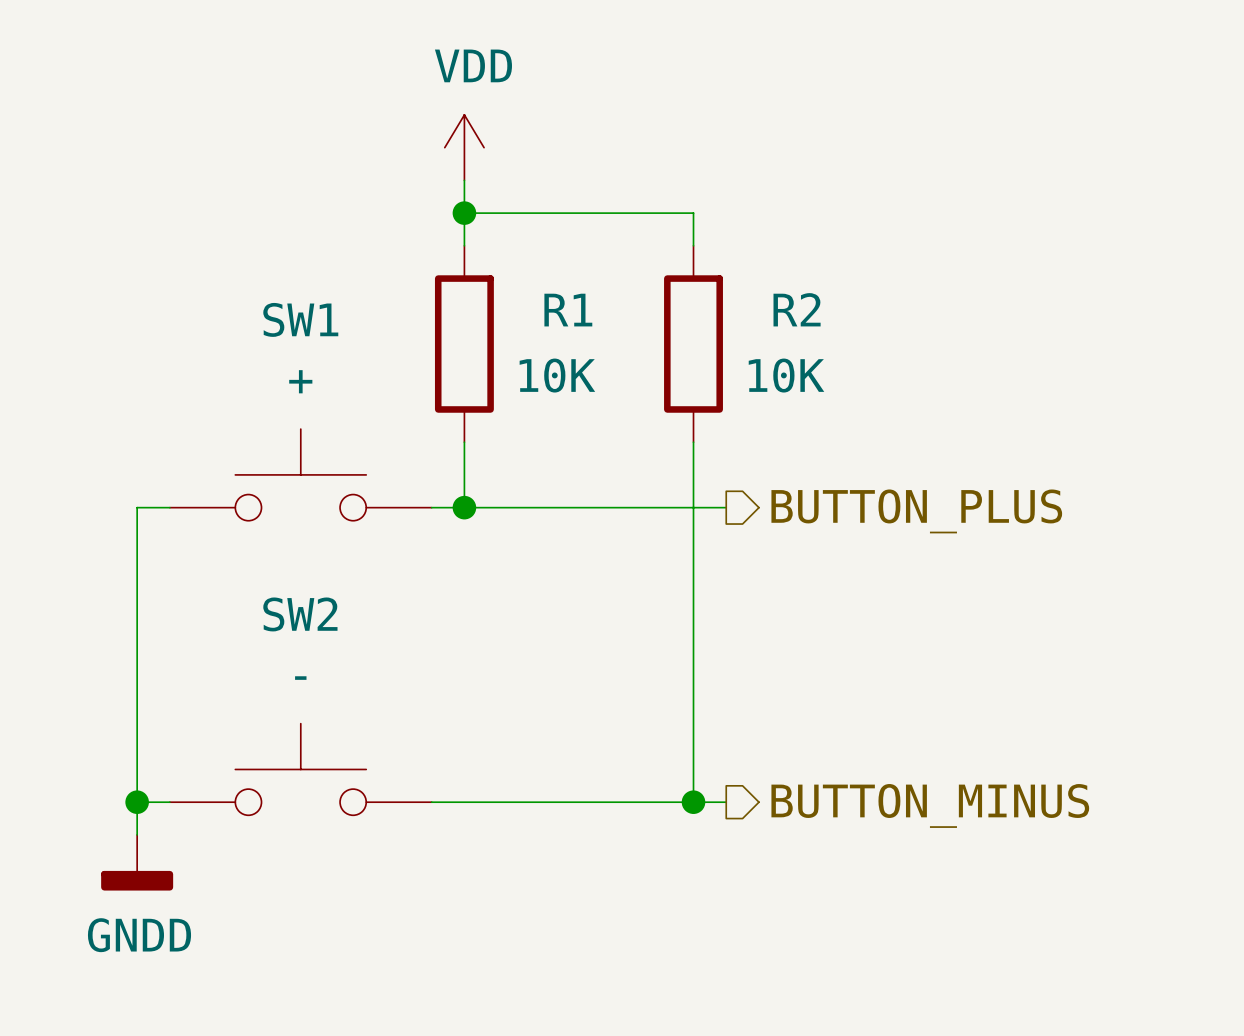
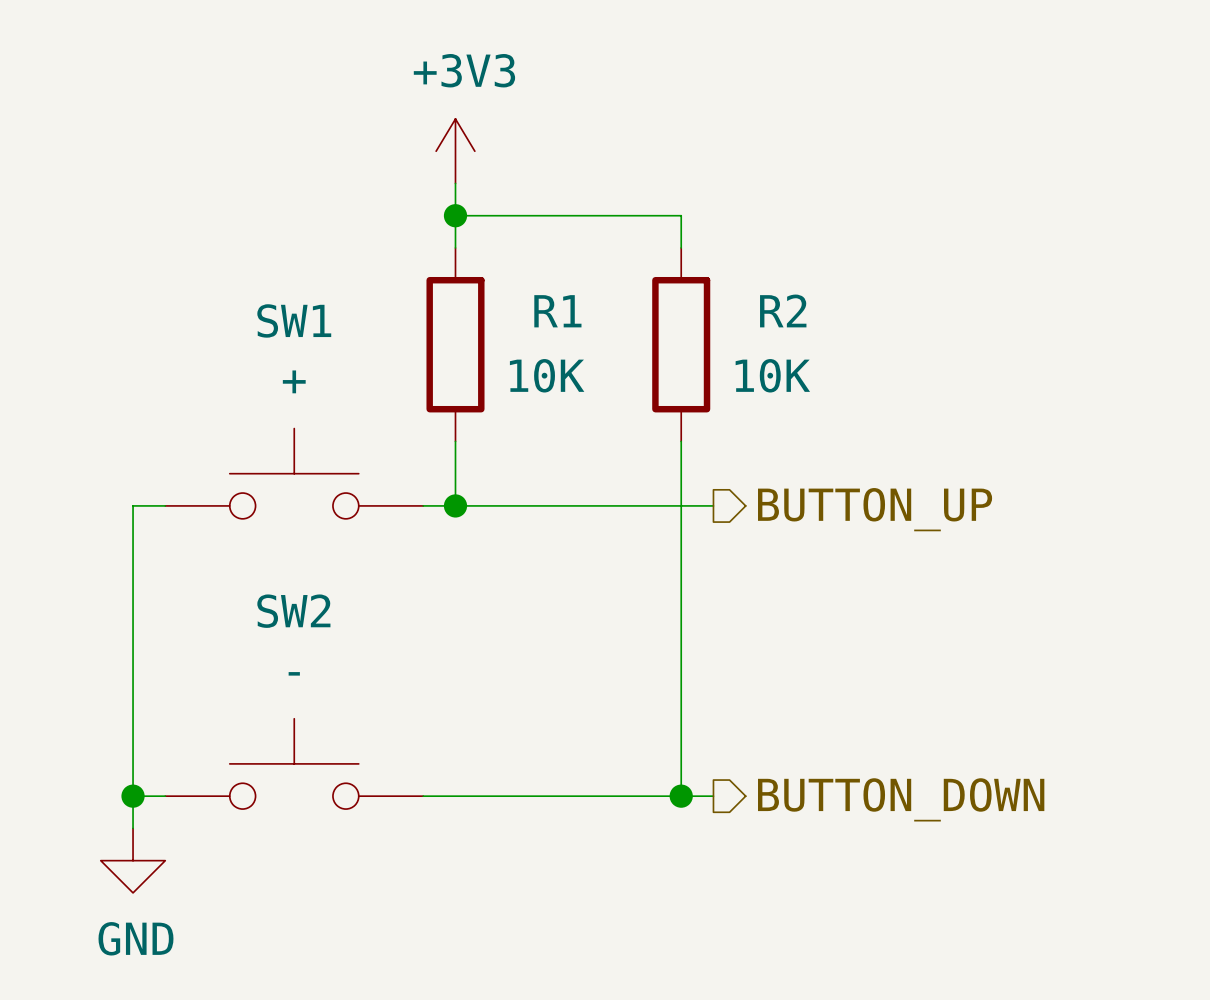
power symbol: VDD (464, 147) -> +3V3 (455, 151)
hierarchical label: BUTTON_PLUS (916, 511) -> BUTTON_UP (875, 509)
hierarchical label: BUTTON_MINUS (930, 805) -> BUTTON_DOWN (901, 799)
power symbol: GNDD (137, 862) -> GND (133, 860)

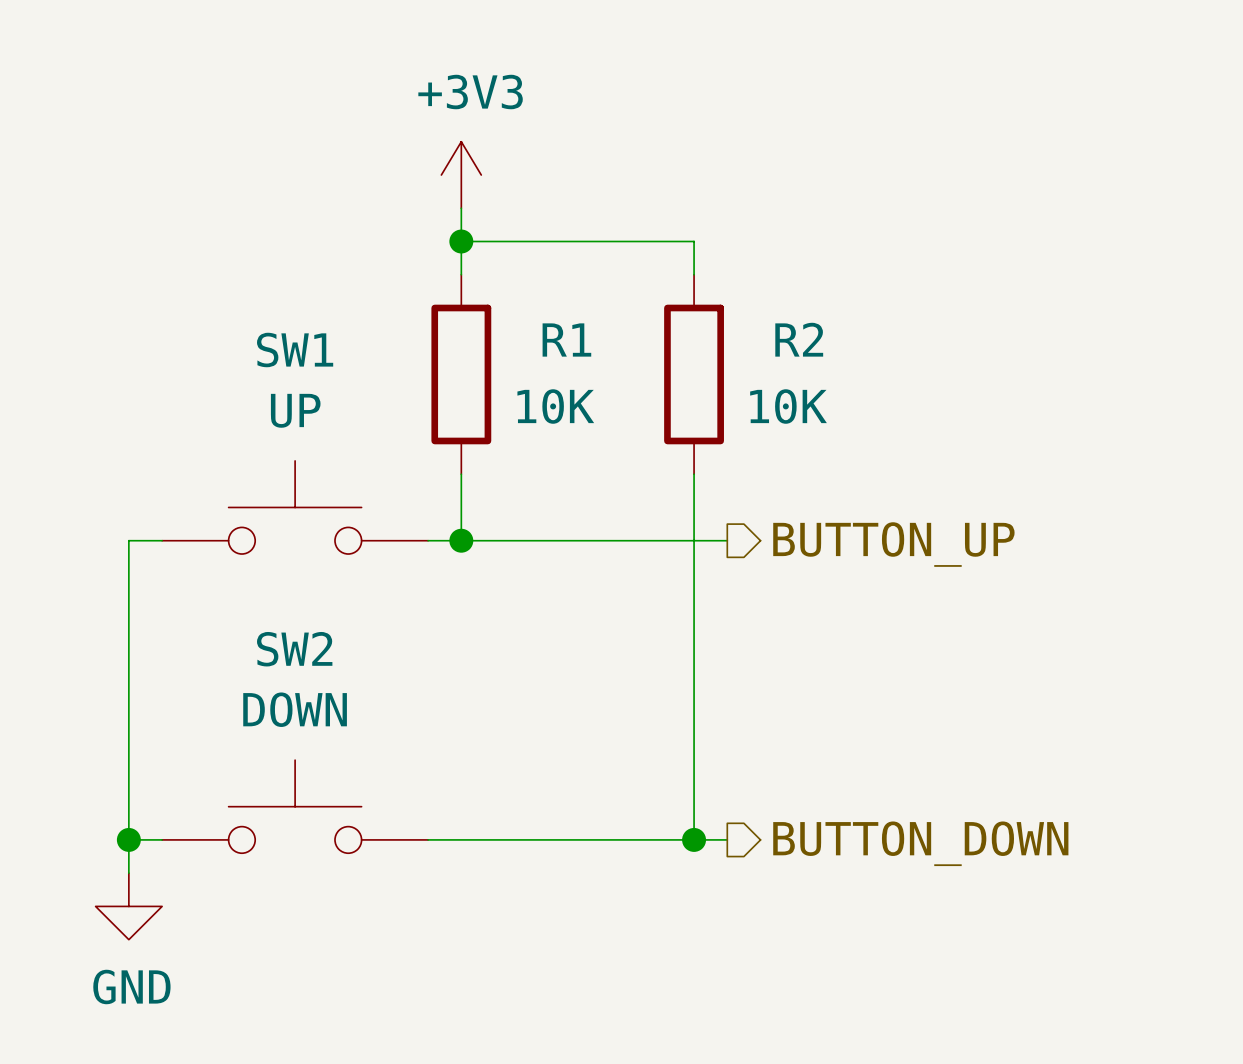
SW1 value: + (294, 381) -> UP (295, 410)
SW2 value: - (294, 673) -> DOWN (295, 709)

